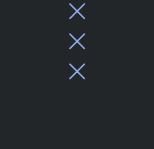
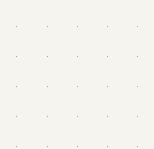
no-connect mark: (77, 11) -> none
no-connect mark: (77, 41) -> none
no-connect mark: (77, 71) -> none

